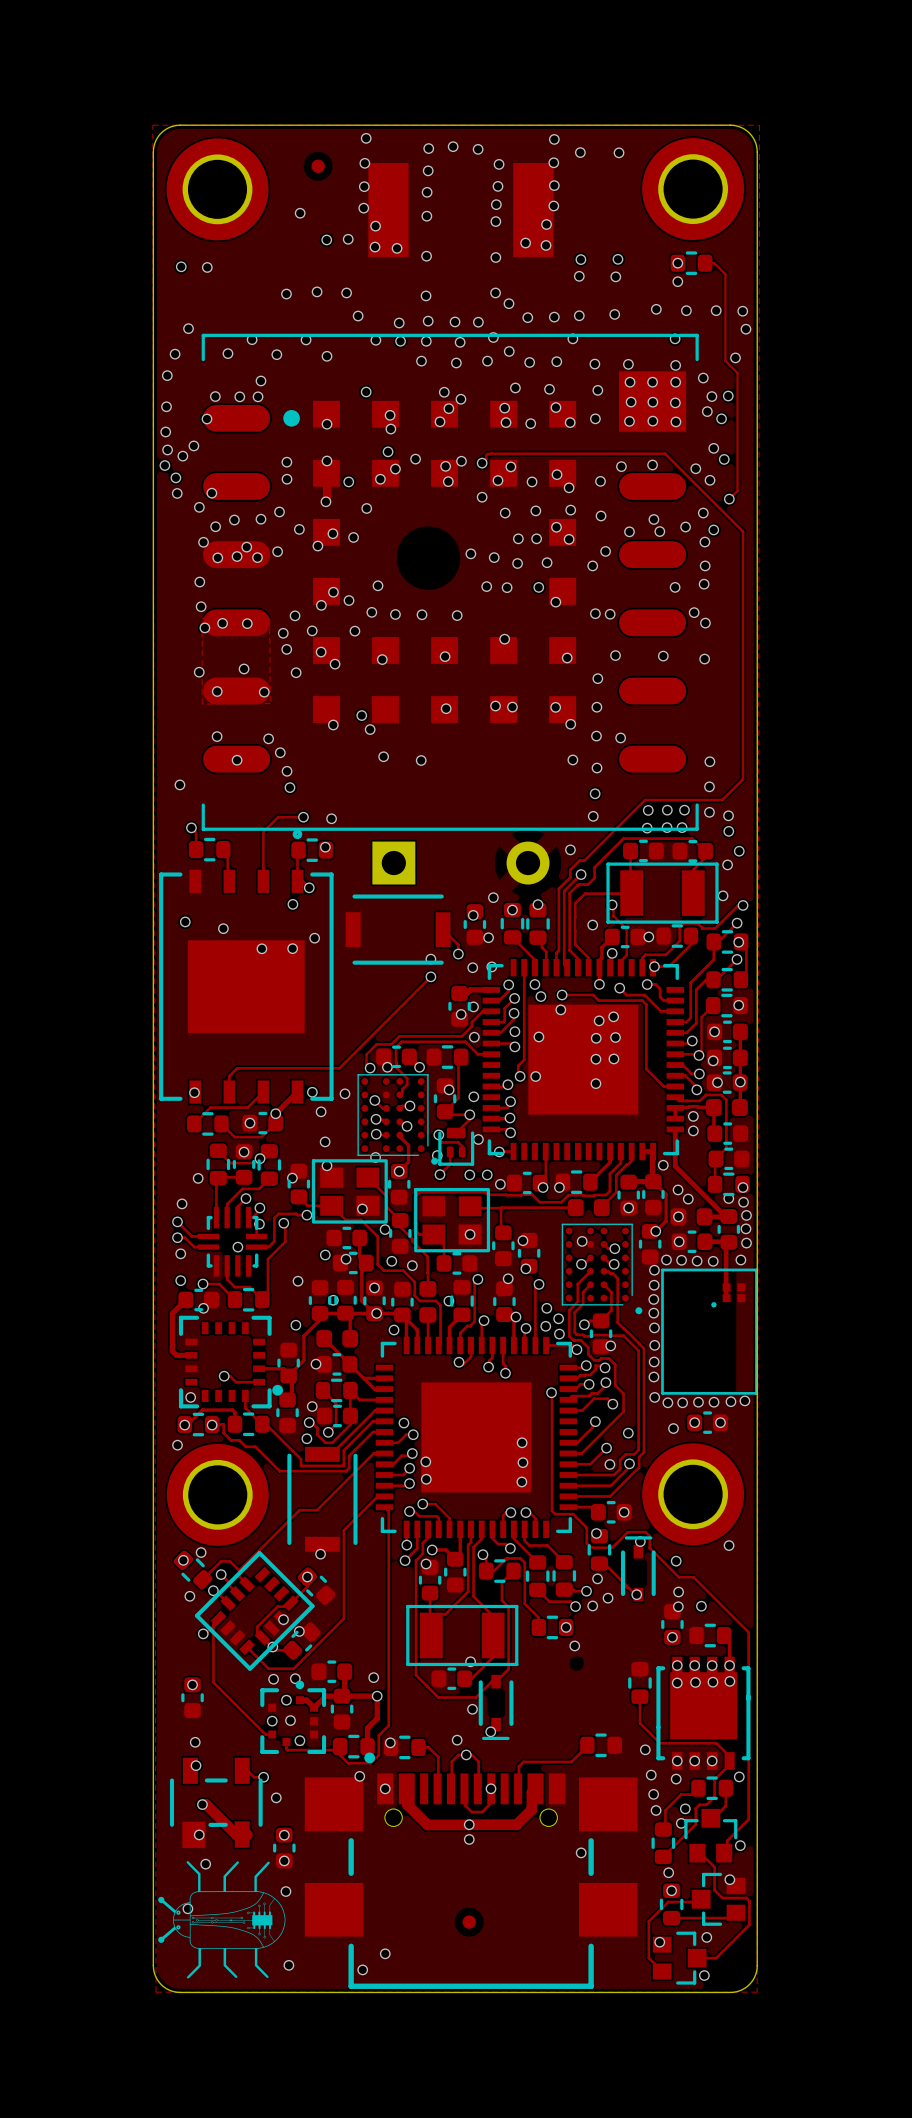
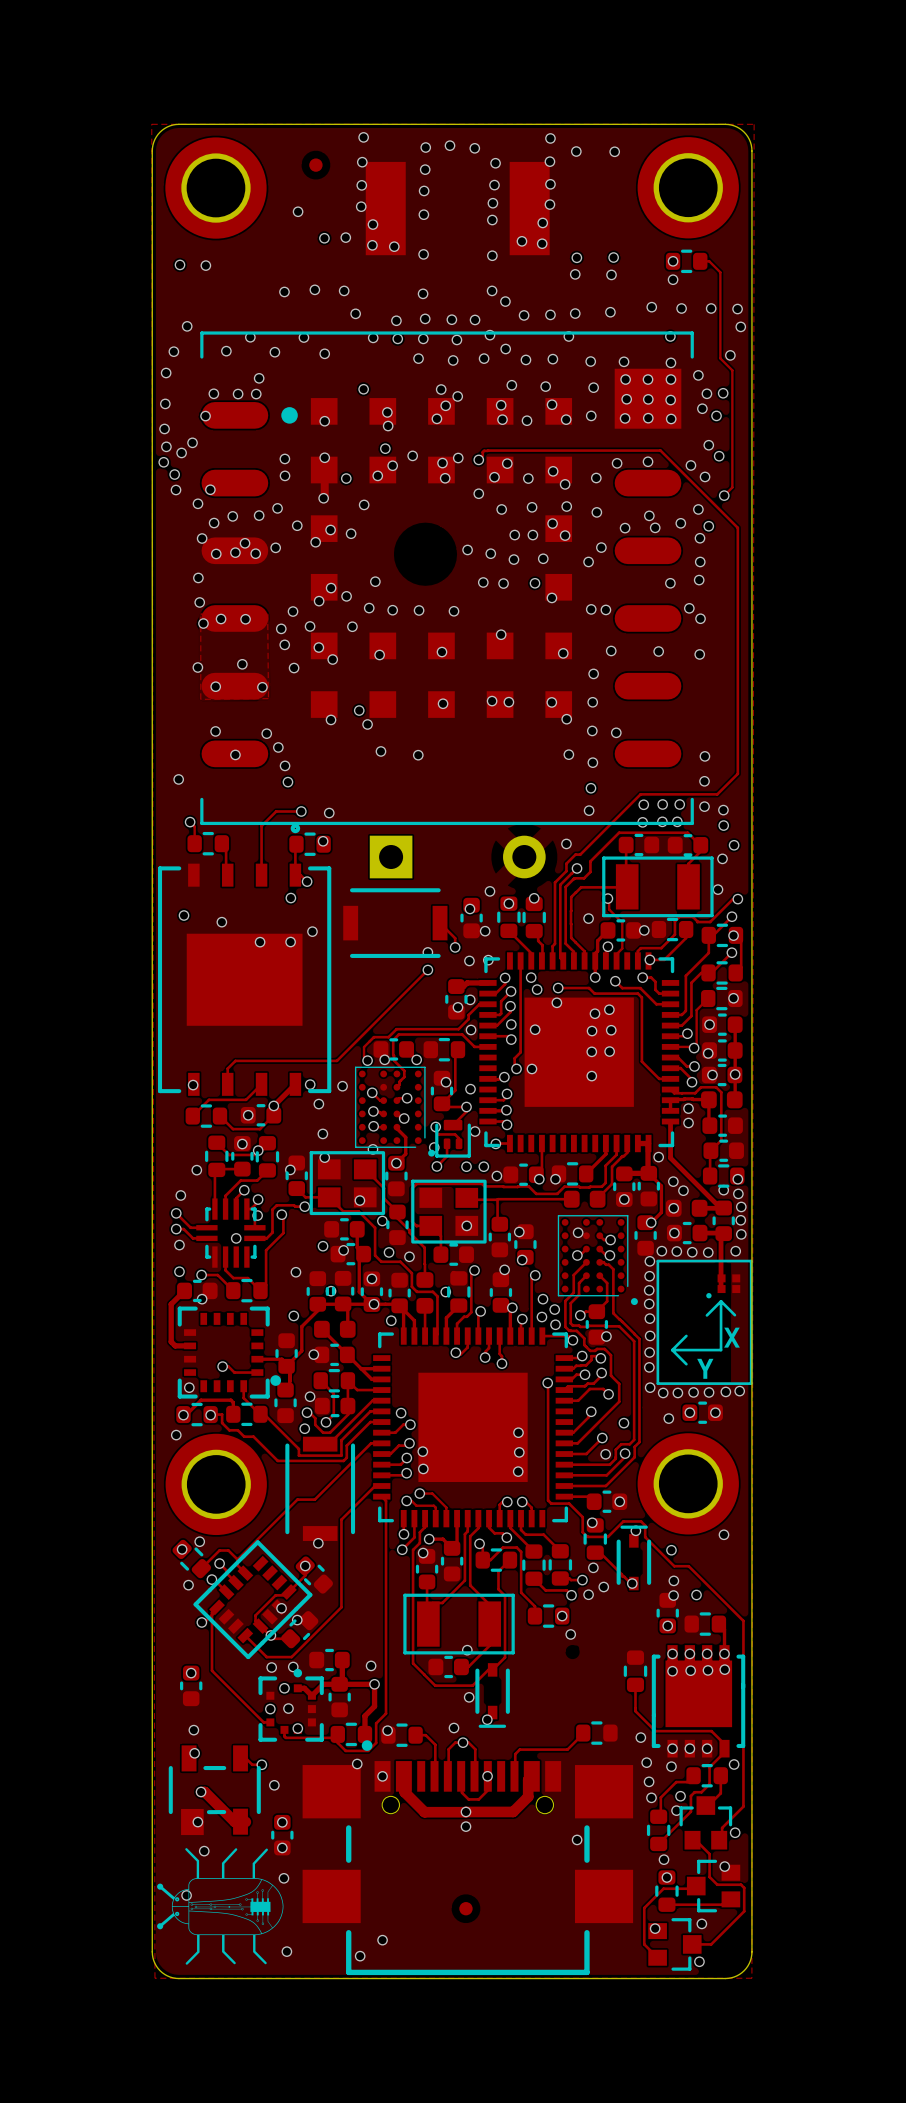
line: none -> (721, 1301) (706, 1315)
line: none -> (721, 1301) (734, 1315)
line: none -> (721, 1301) (721, 1350) (672, 1350)
line: none -> (686, 1335) (672, 1350)
text: none -> X (731, 1337)
line: none -> (672, 1350) (686, 1364)
text: none -> Y (705, 1368)

